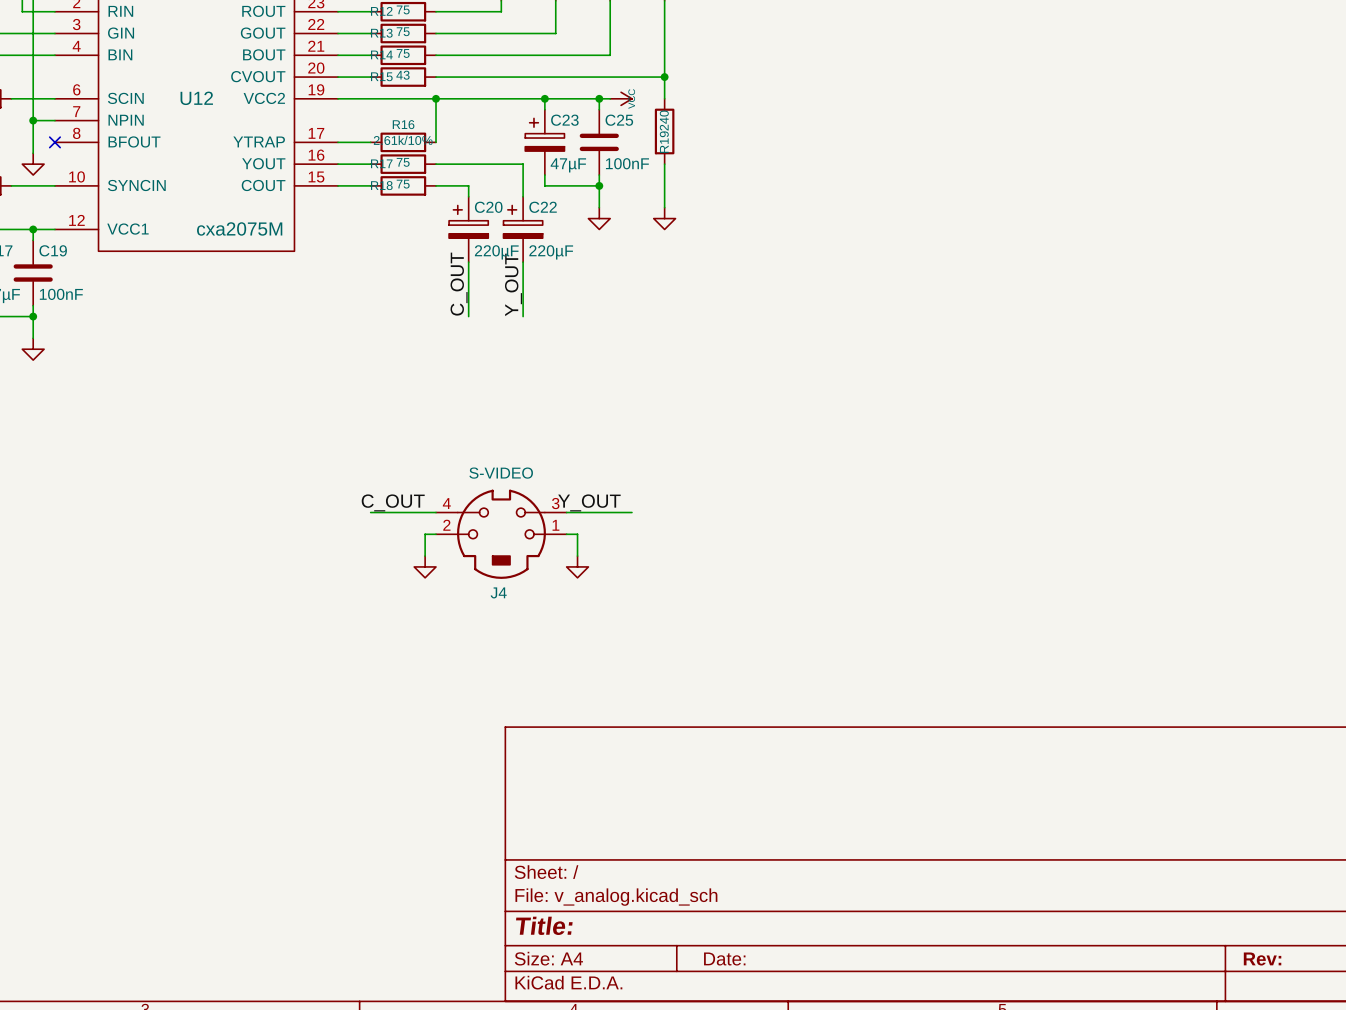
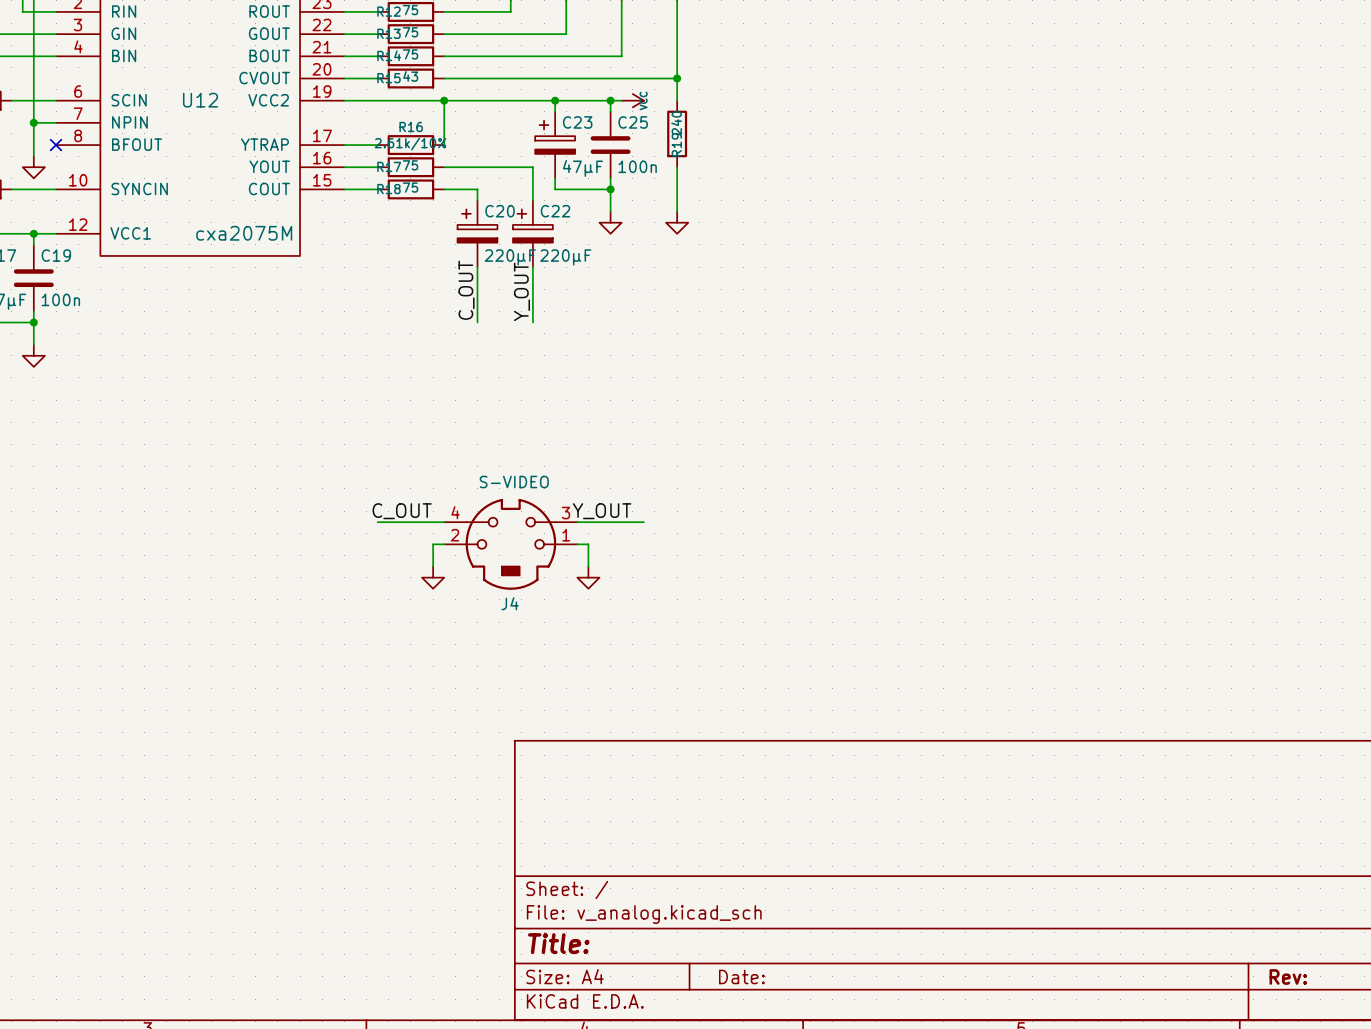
C25 value: 100nF (627, 163) -> 100n (637, 166)
C19 value: 100nF (61, 294) -> 100n (60, 299)

